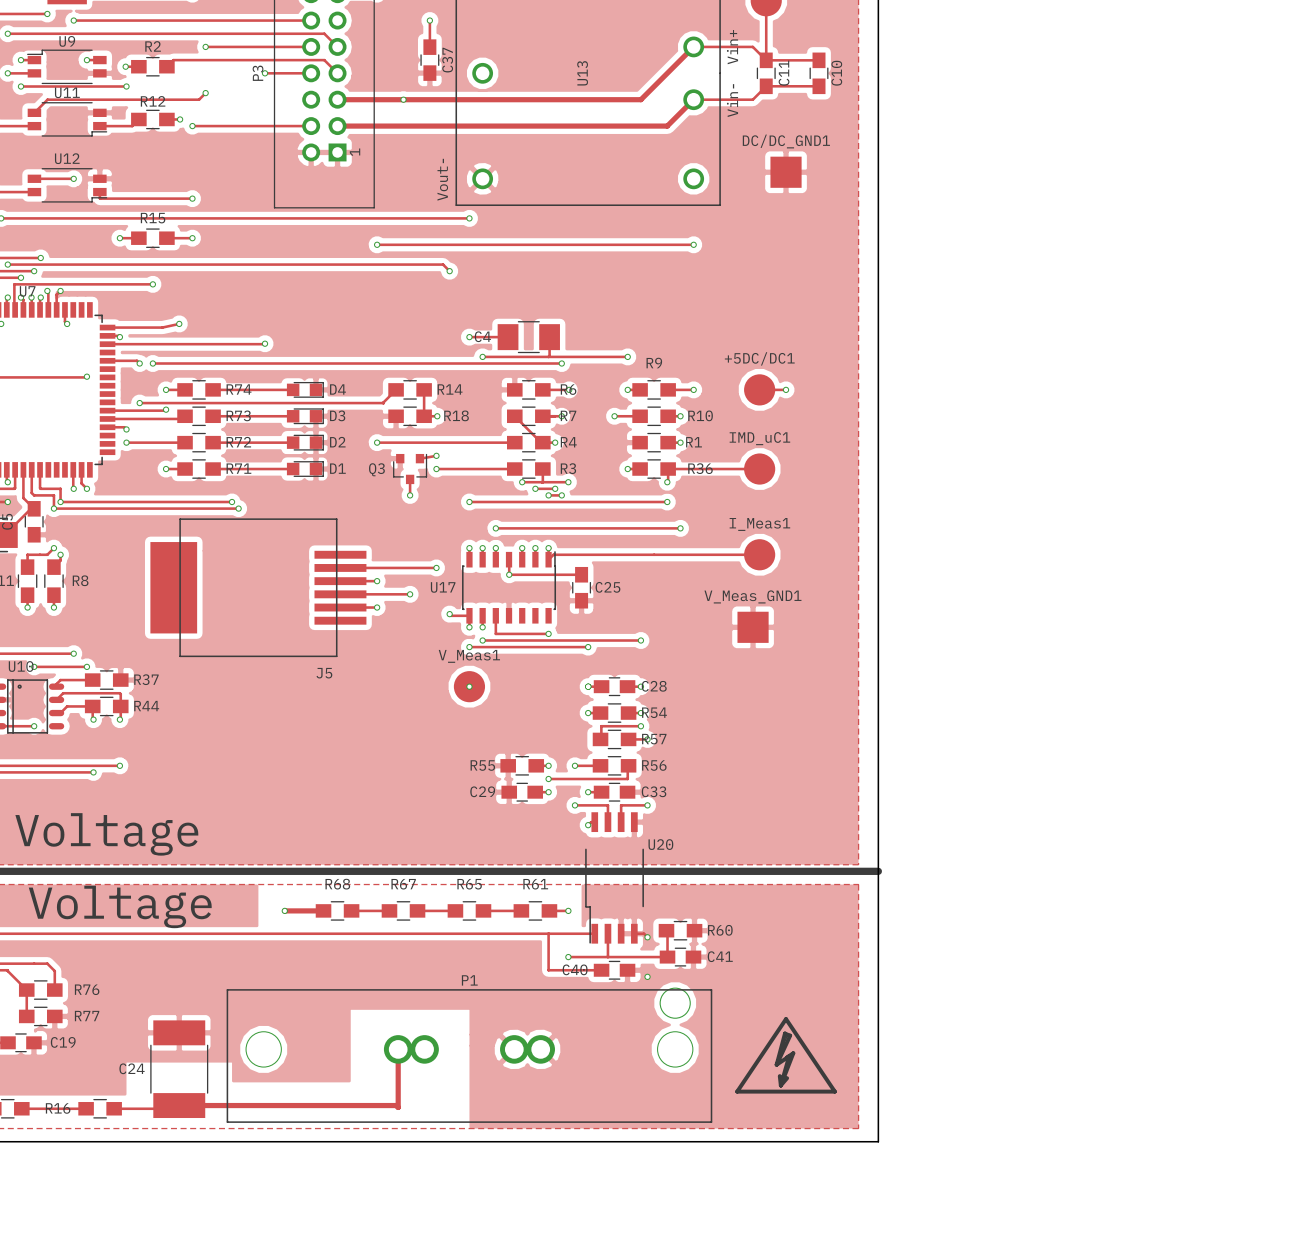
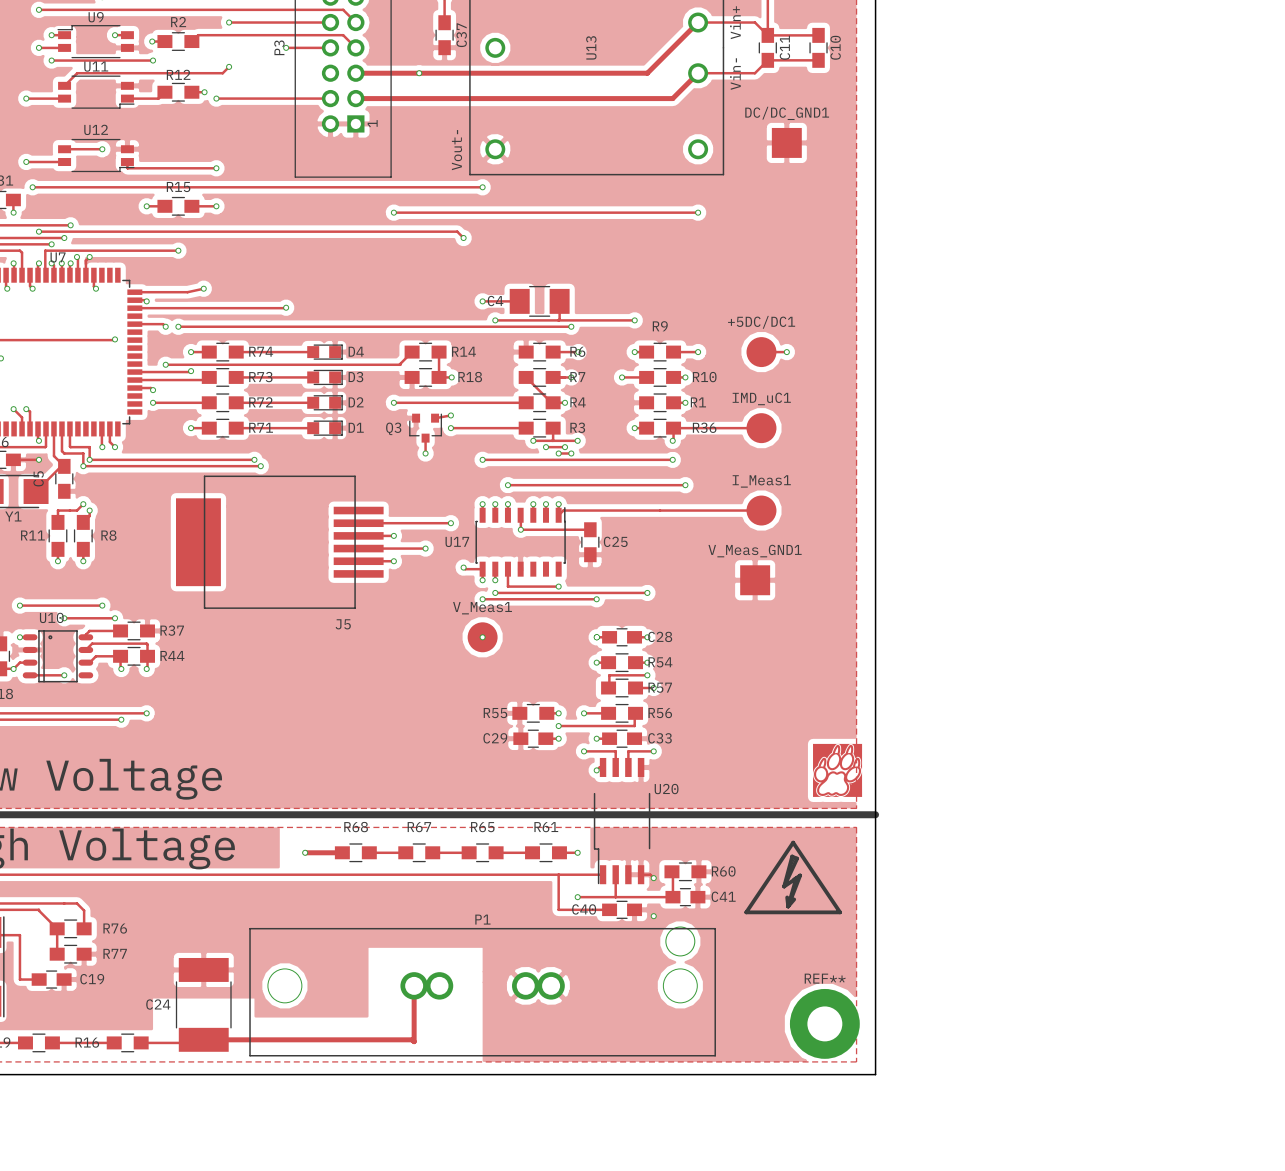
drawing: none -> [813, 743, 863, 797]
drawing position: (786, 1055) -> (793, 877)
REF**: none -> (824, 1023)

